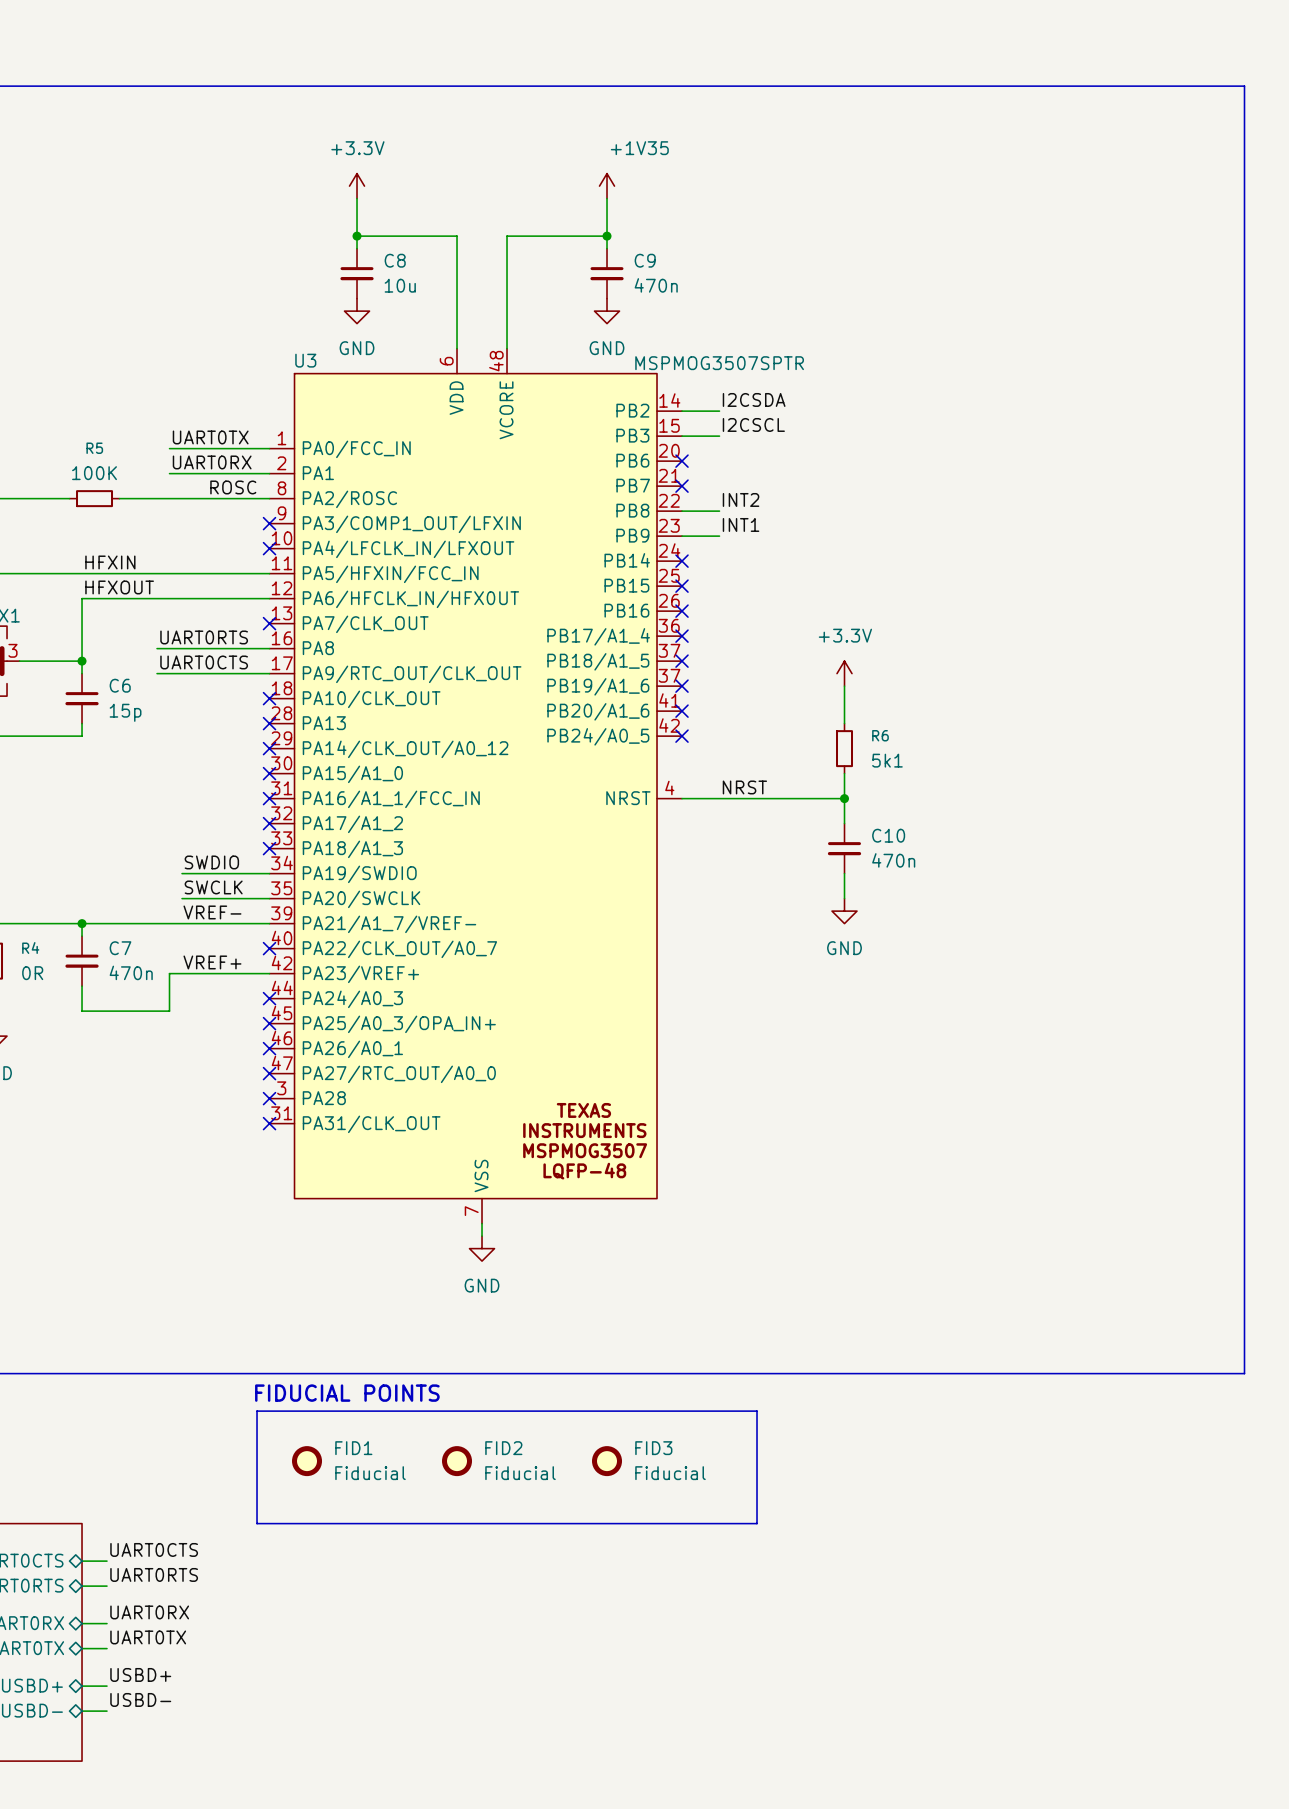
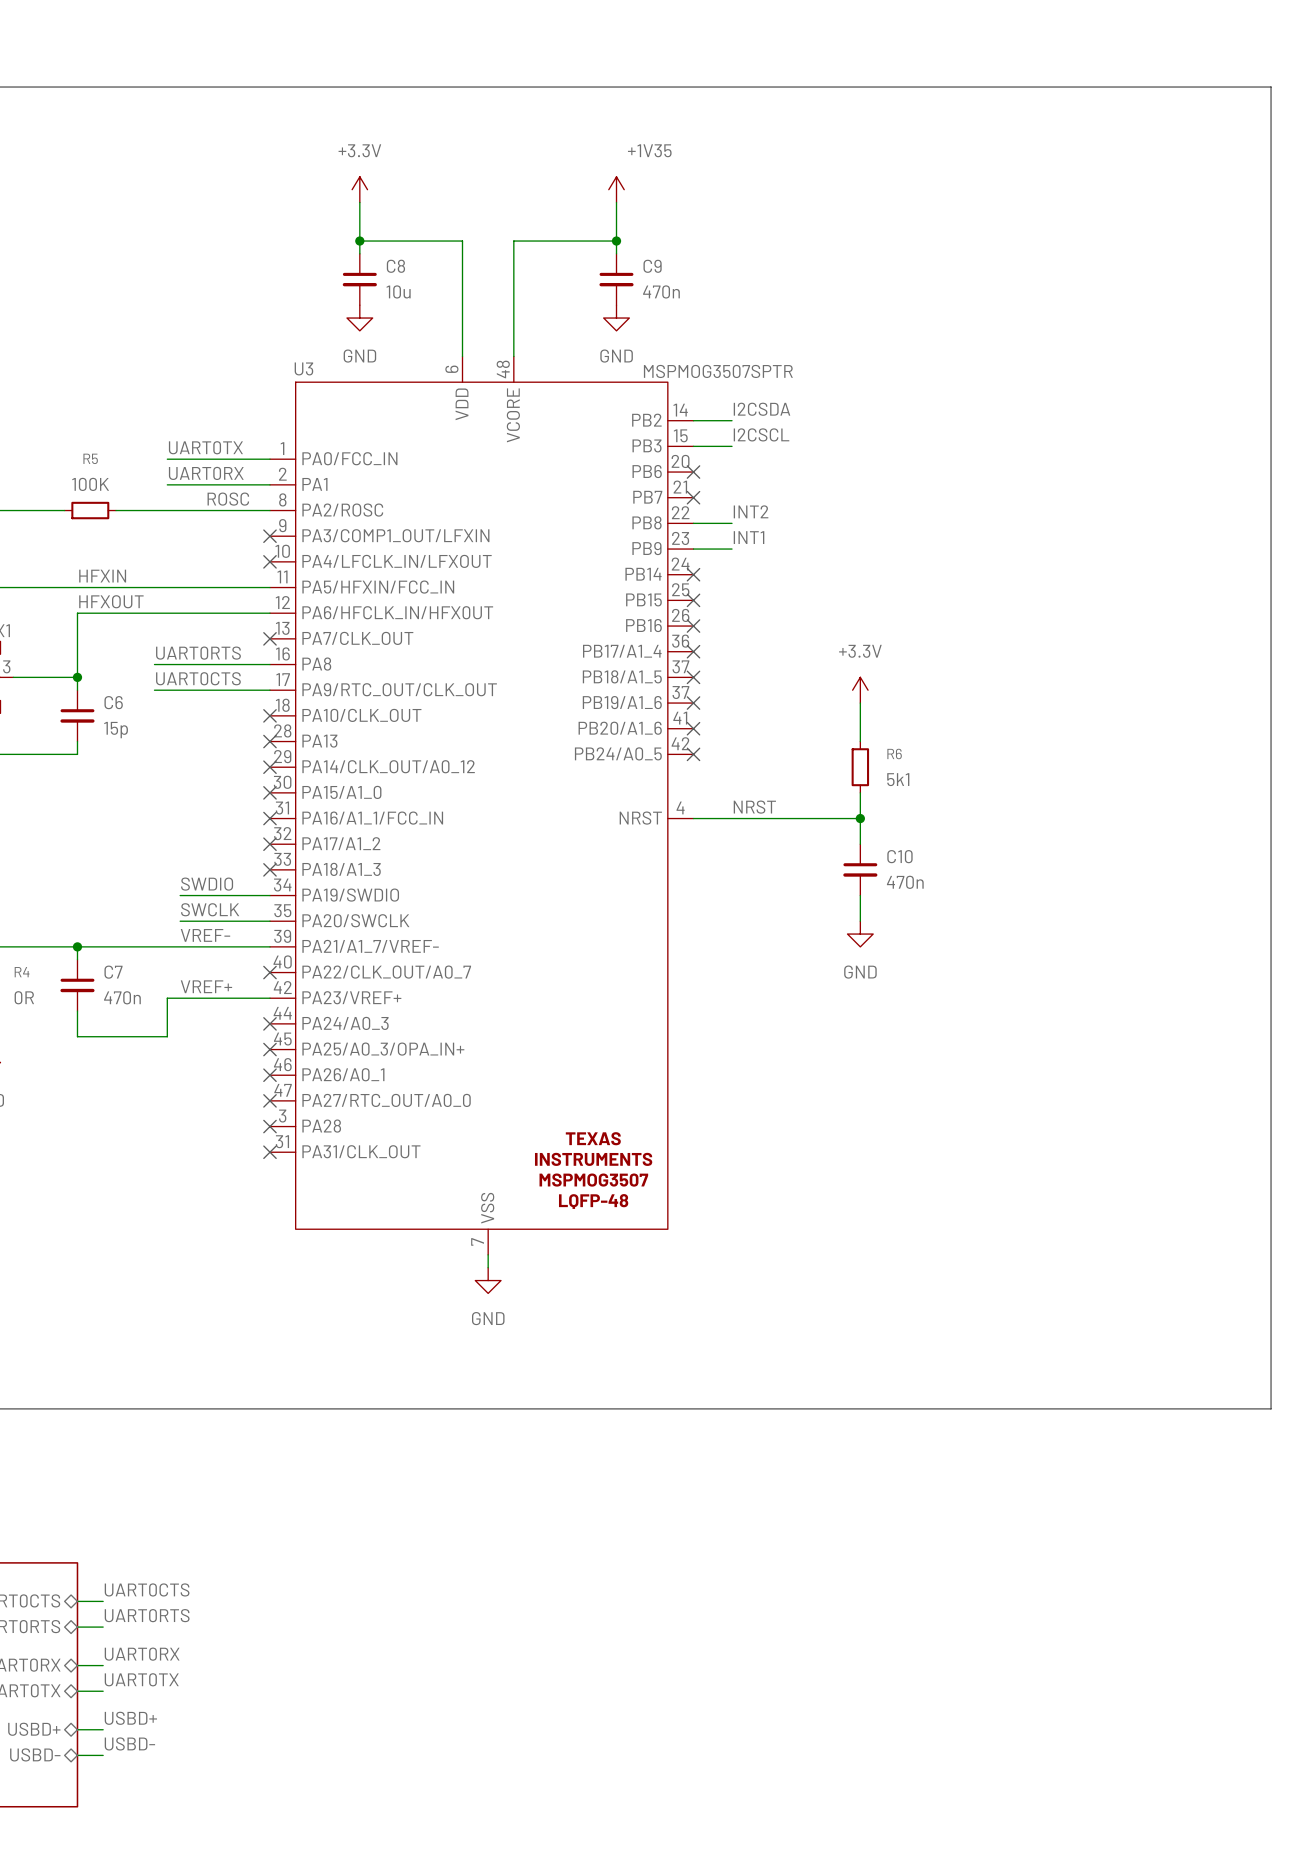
text: FIDUCIAL POINTS (347, 1393) -> none
line: (257, 1411) (757, 1411) (757, 1523) (257, 1523) (257, 1411) -> none
FID1: Fiducial (307, 1461) -> none
FID2: Fiducial (457, 1461) -> none
FID3: Fiducial (607, 1461) -> none

